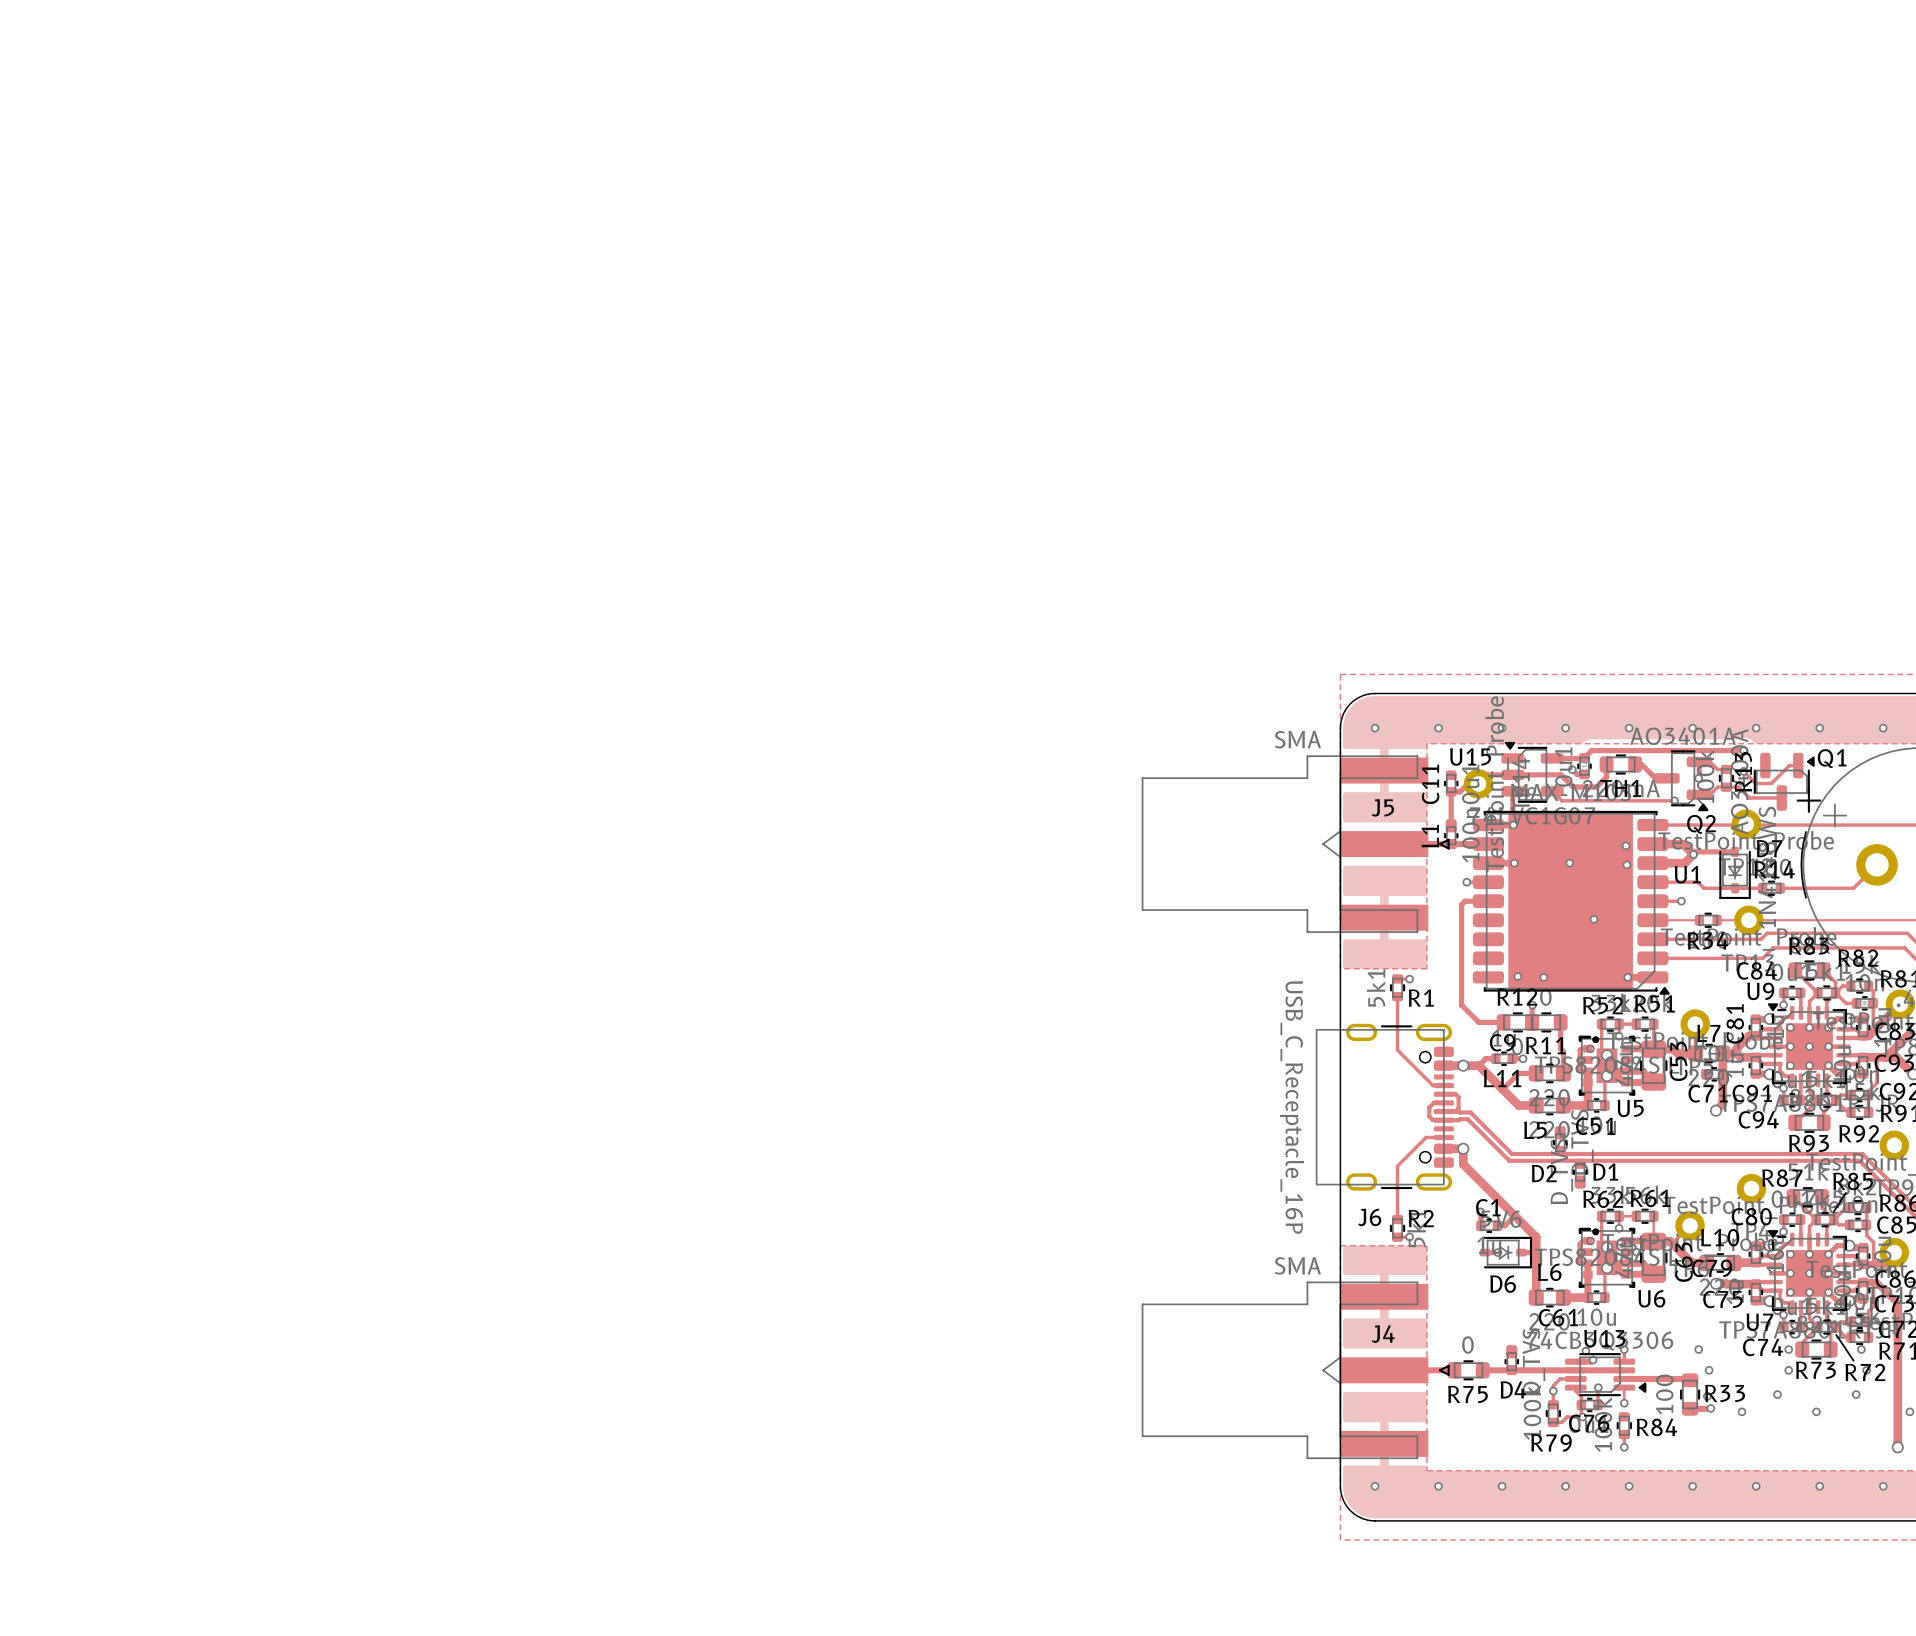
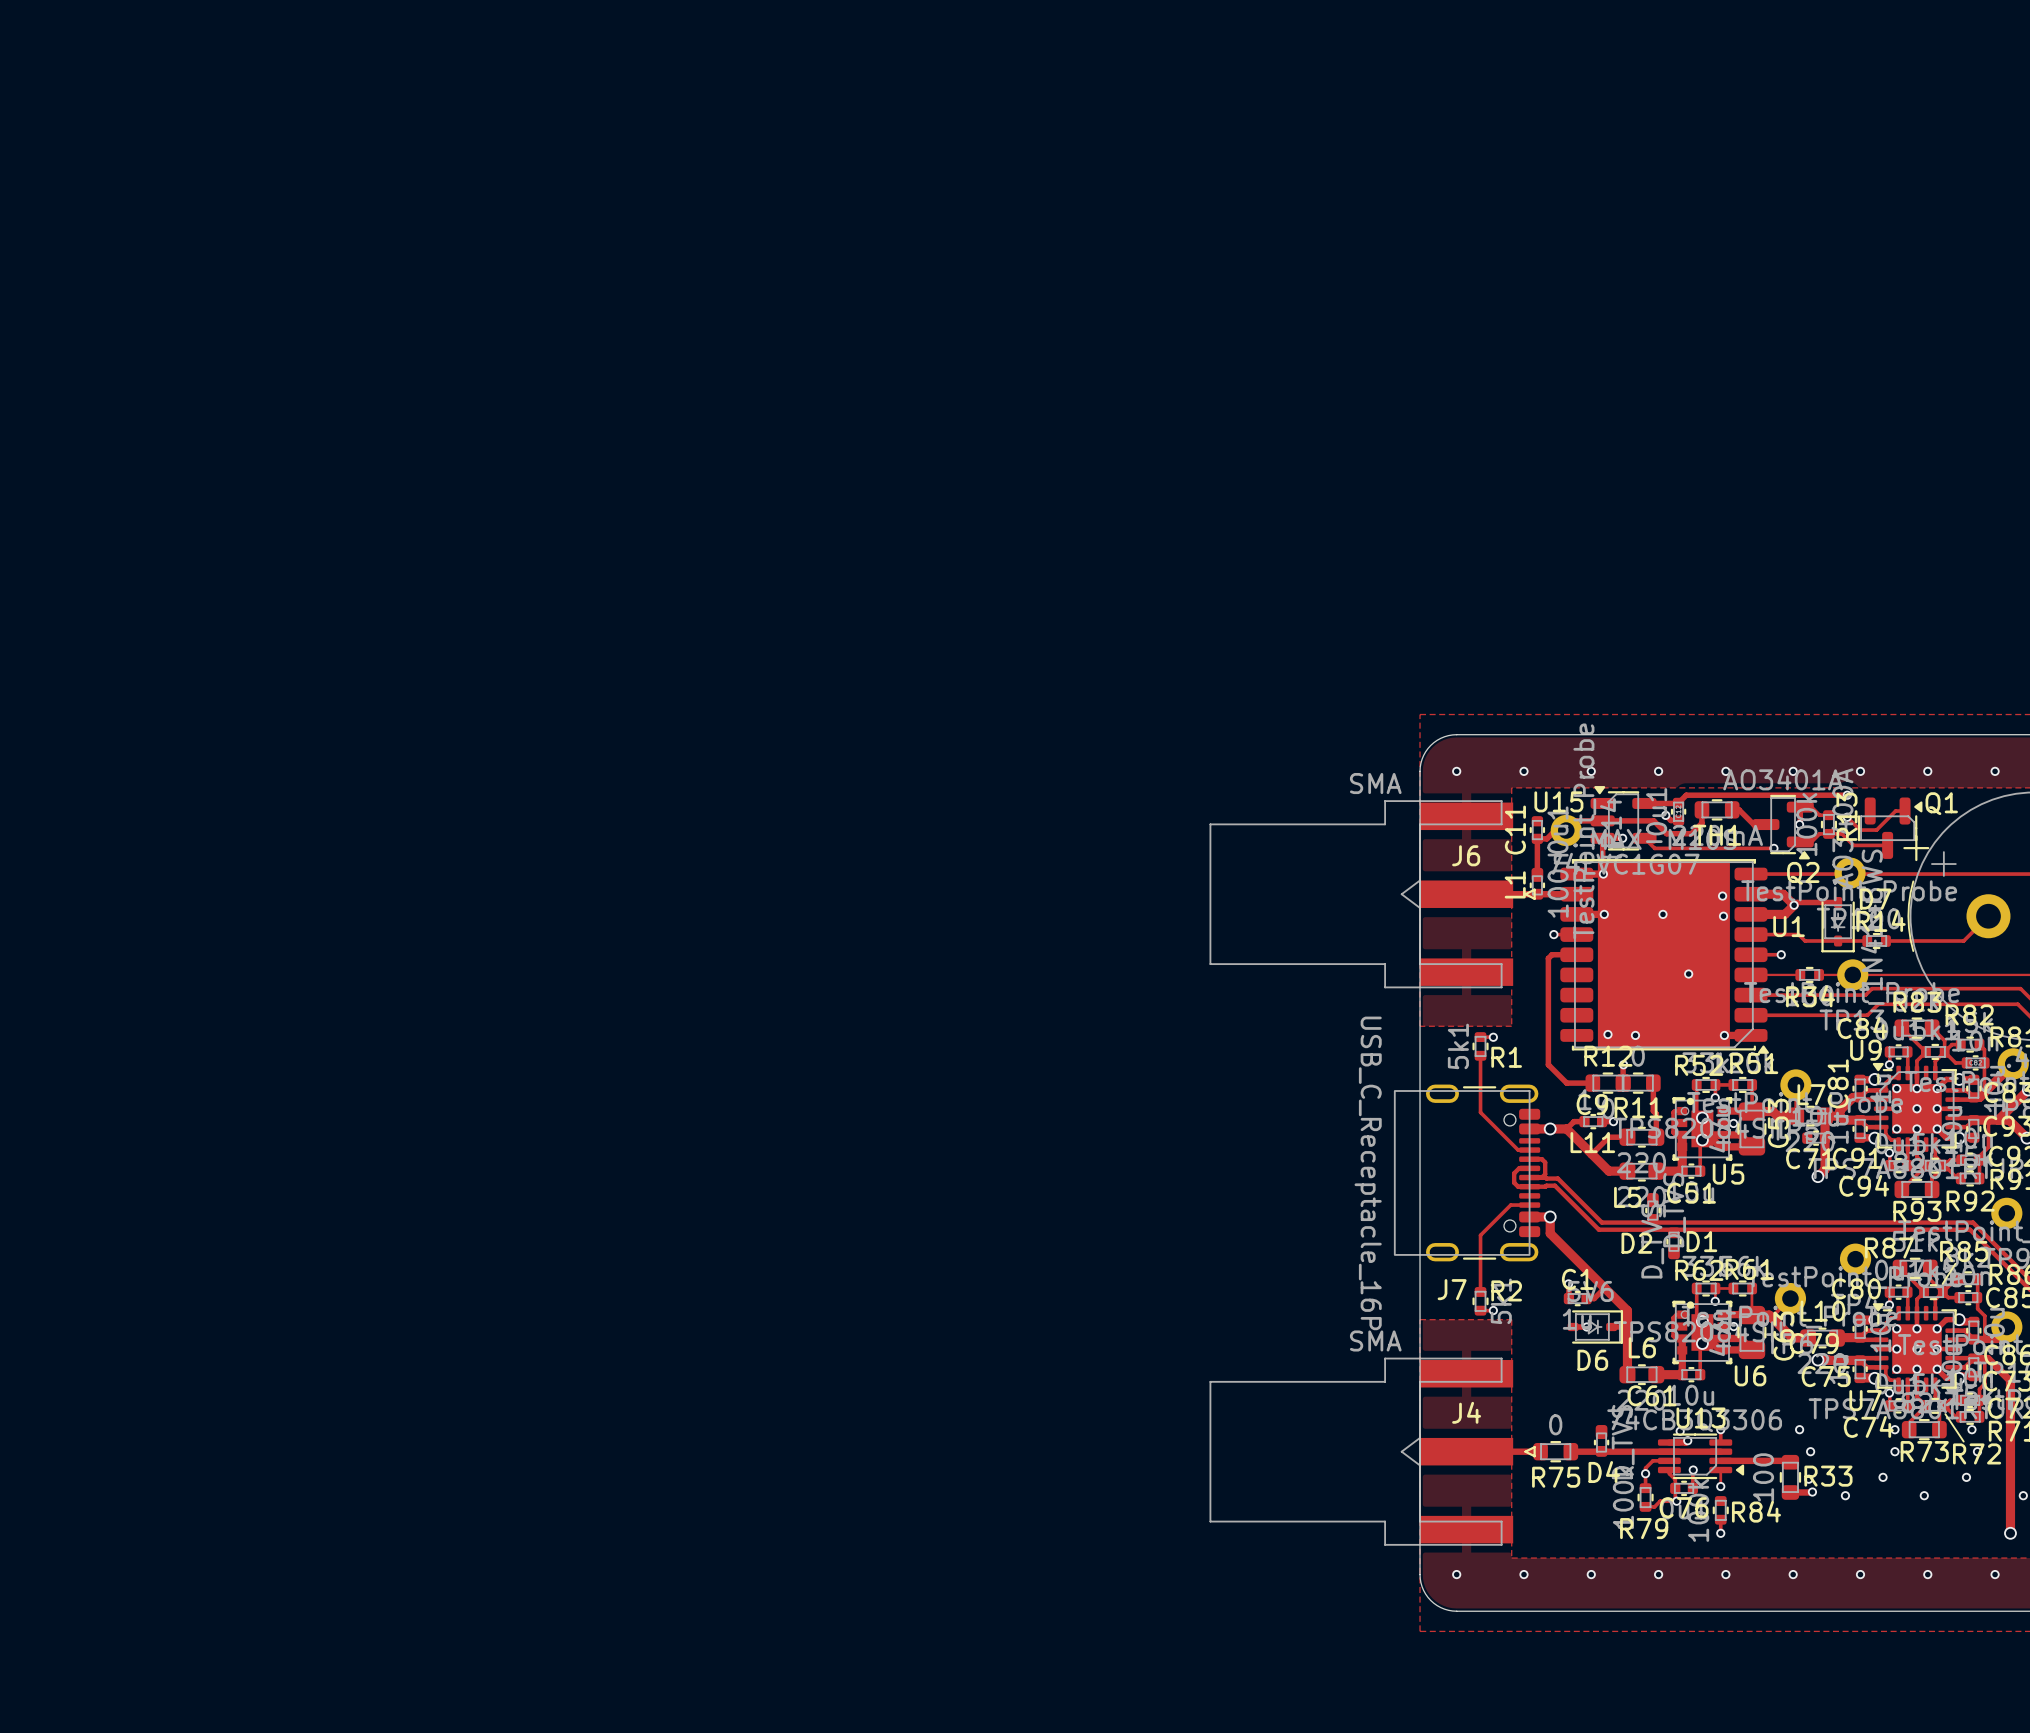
J5 name: J5 (1382, 807) -> J6 (1466, 855)
J6 name: J6 (1369, 1217) -> J7 (1452, 1289)

